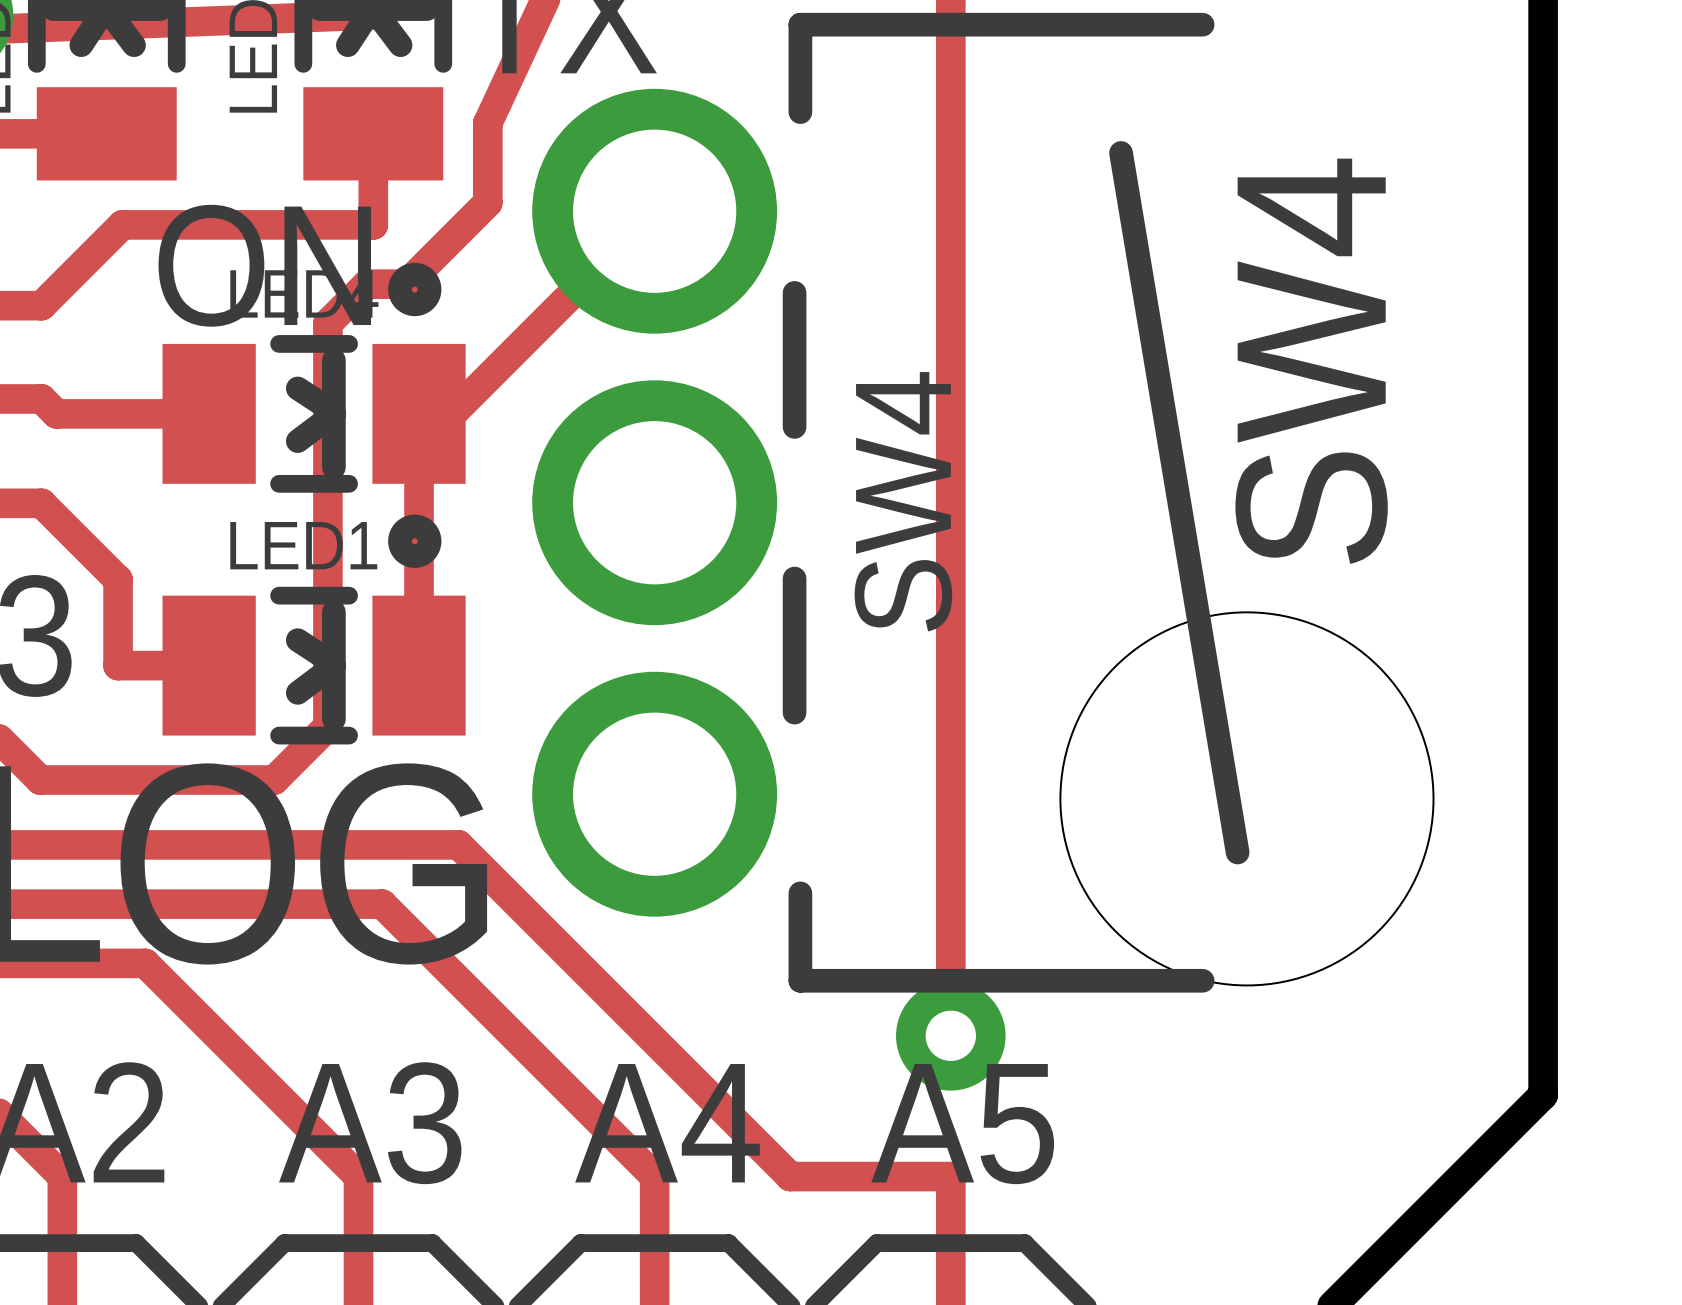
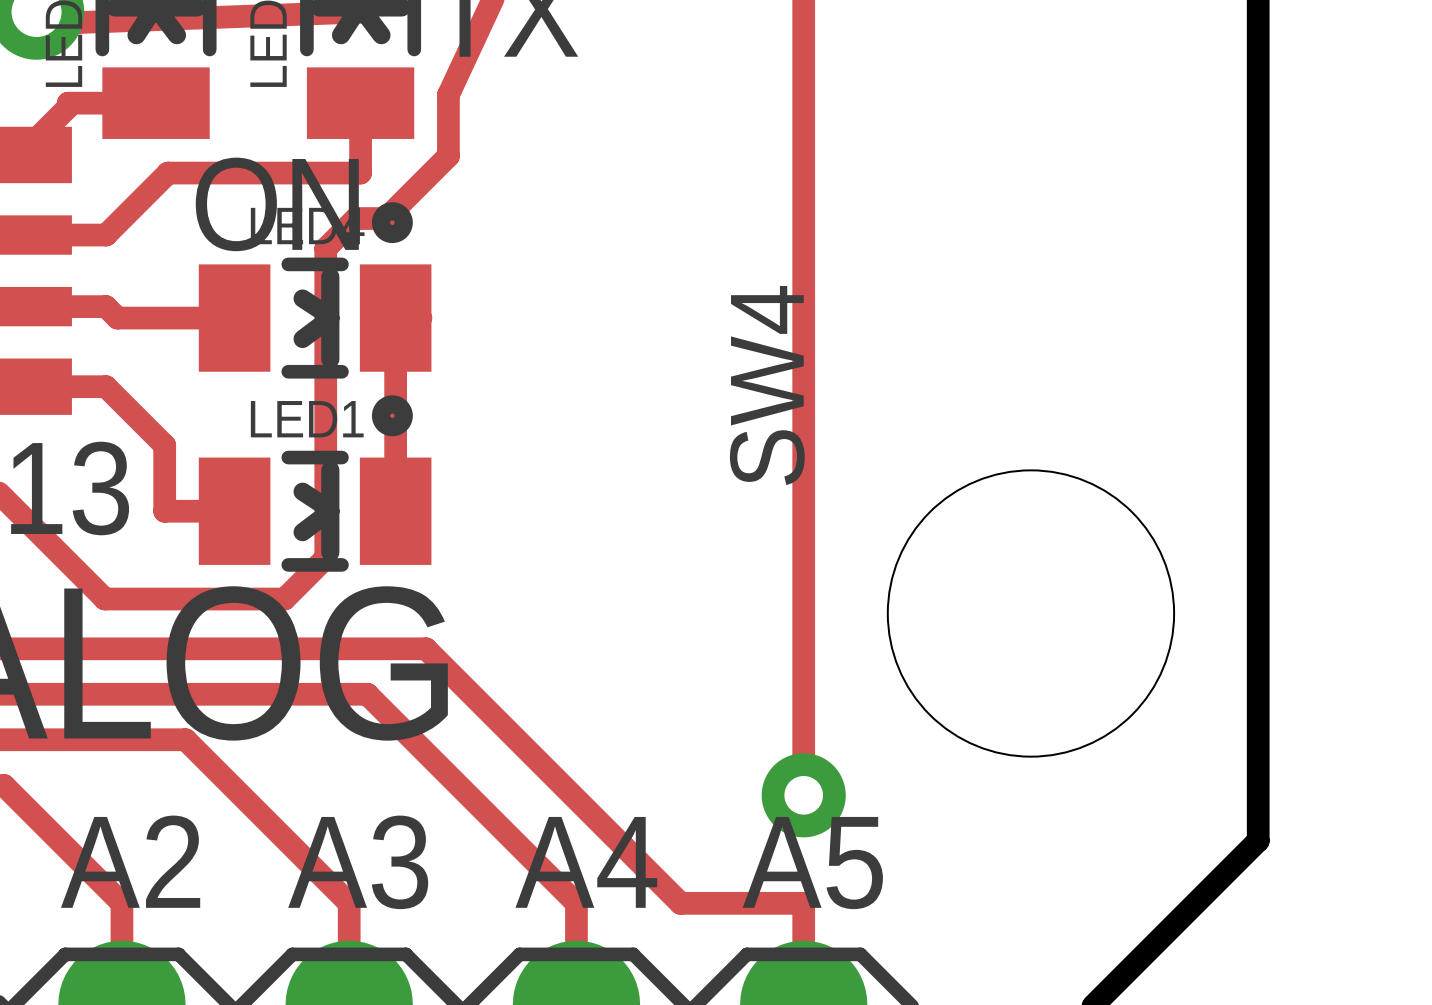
track: (654, 211) (452, 413) -> none
SW4: (890, 502) -> none

